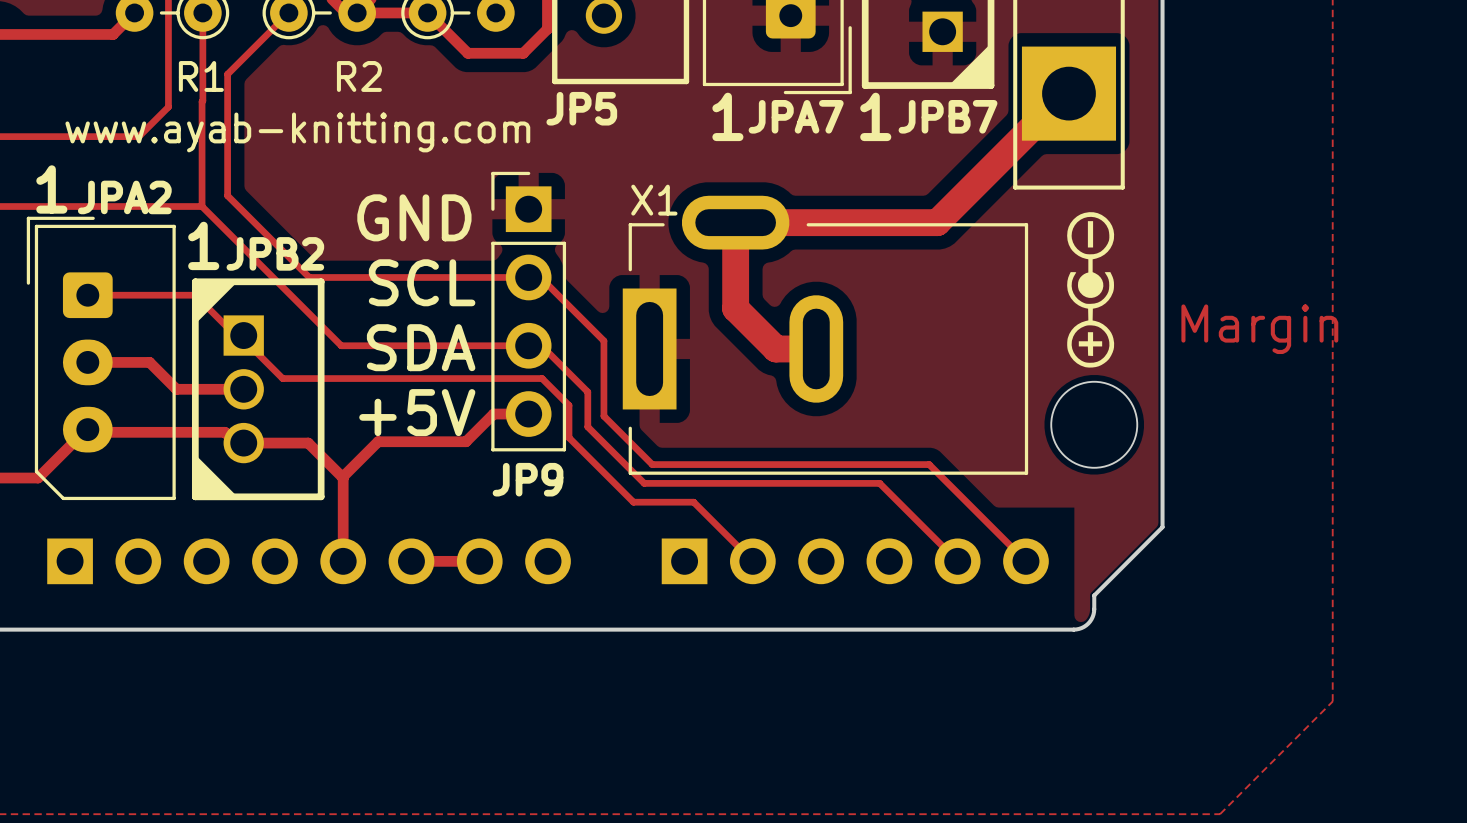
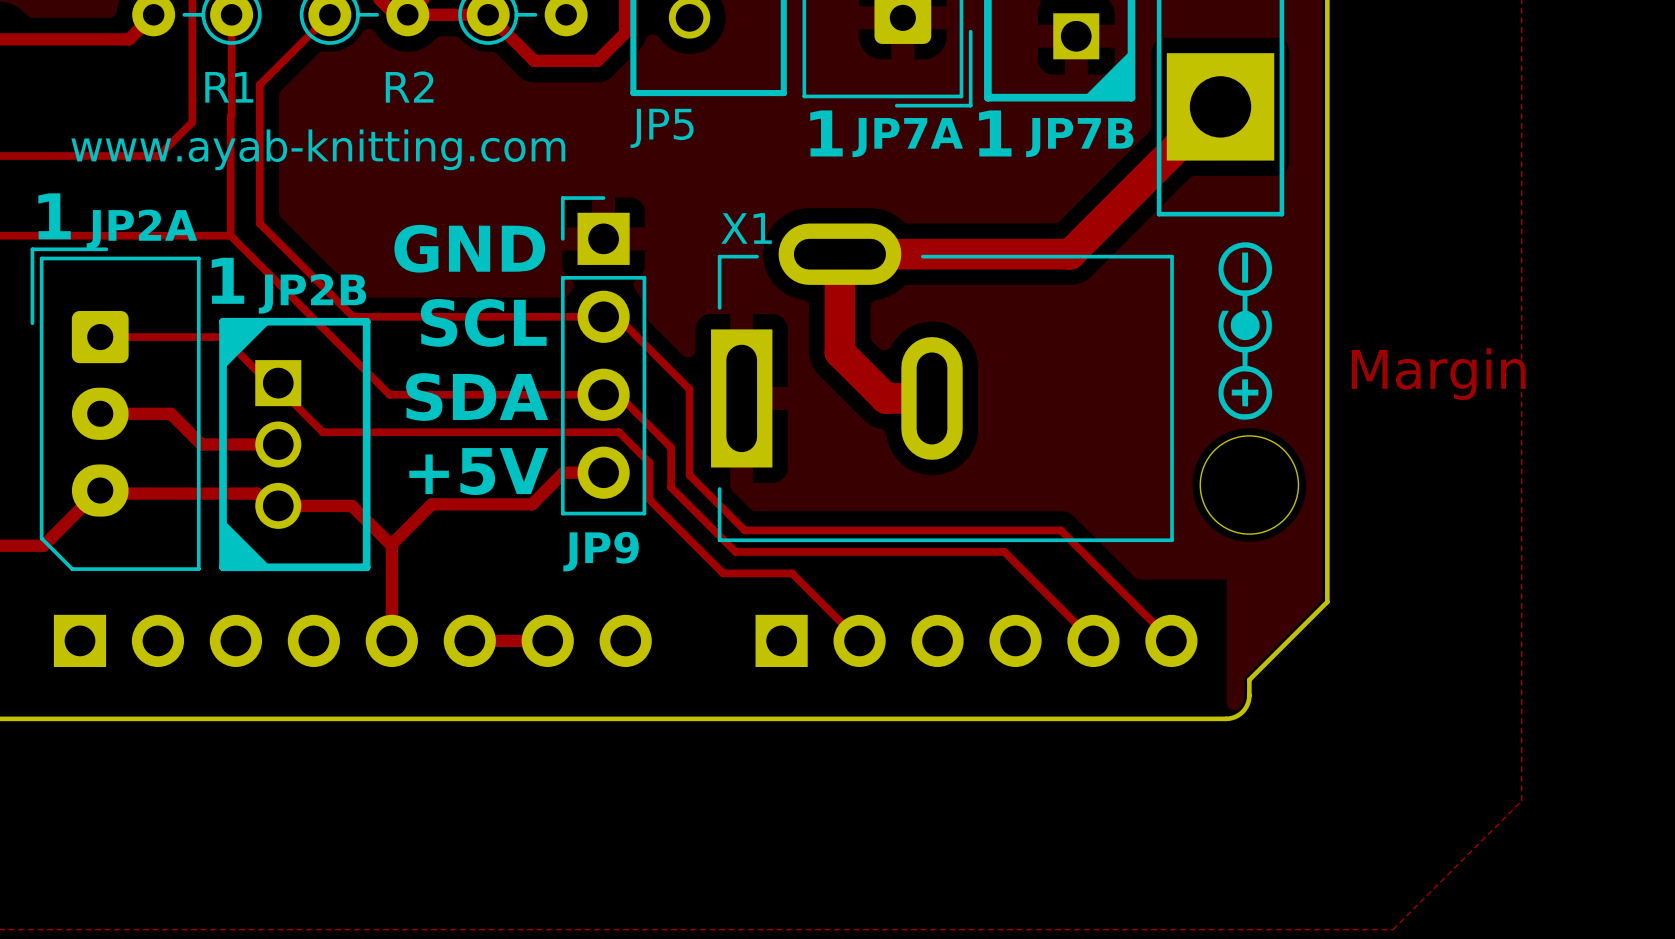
JPA7 name: JPA7 (796, 116) -> JP7A (907, 137)
JPB7 name: JPB7 (948, 116) -> JP7B (1079, 137)
JPA2 name: JPA2 (124, 197) -> JP2A (141, 229)
JPB2 name: JPB2 (275, 253) -> JP2B (312, 293)

